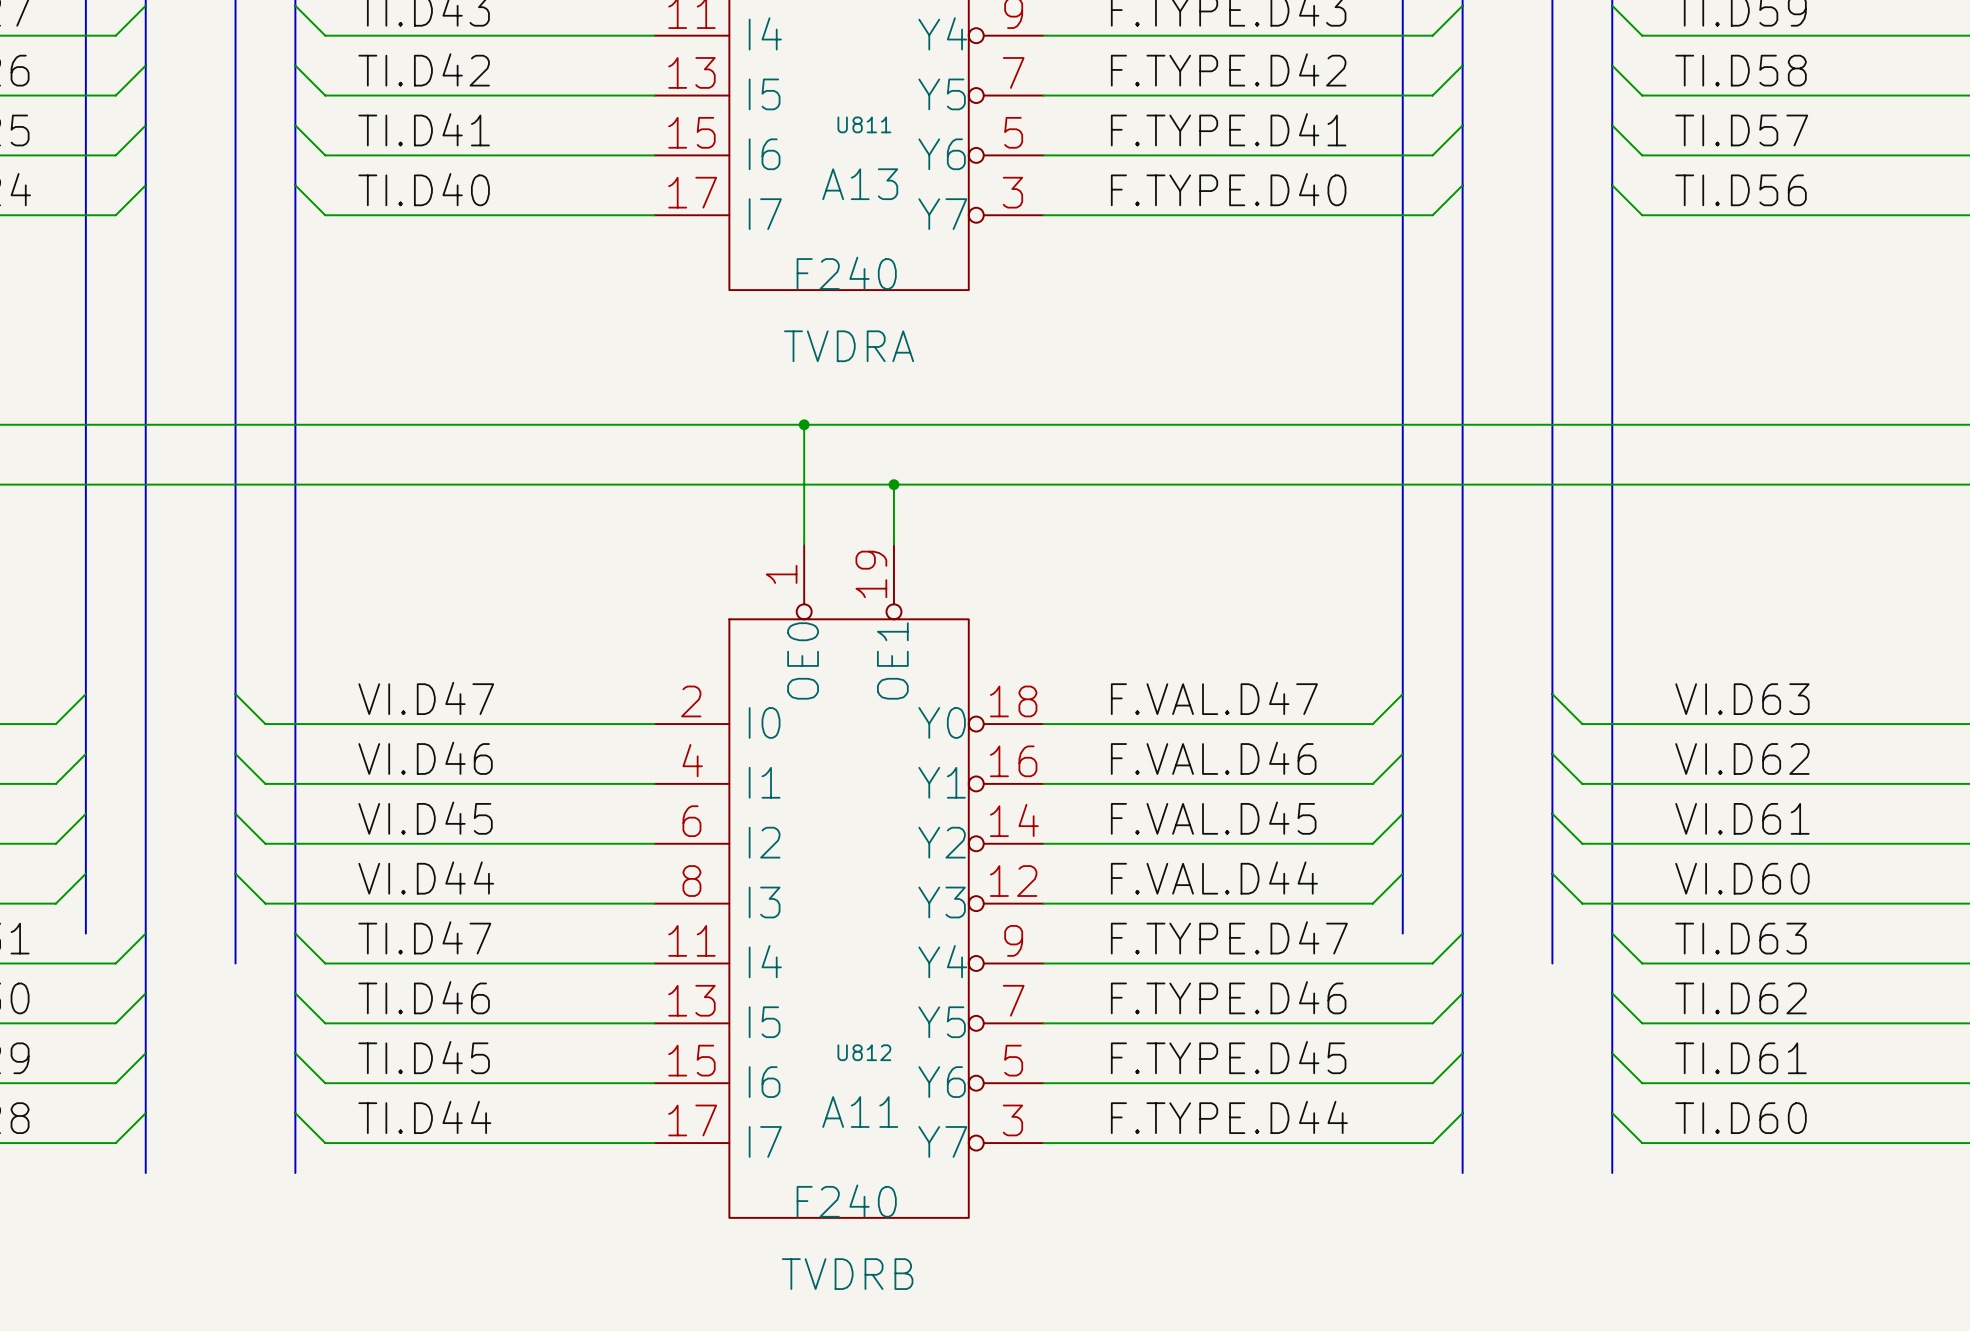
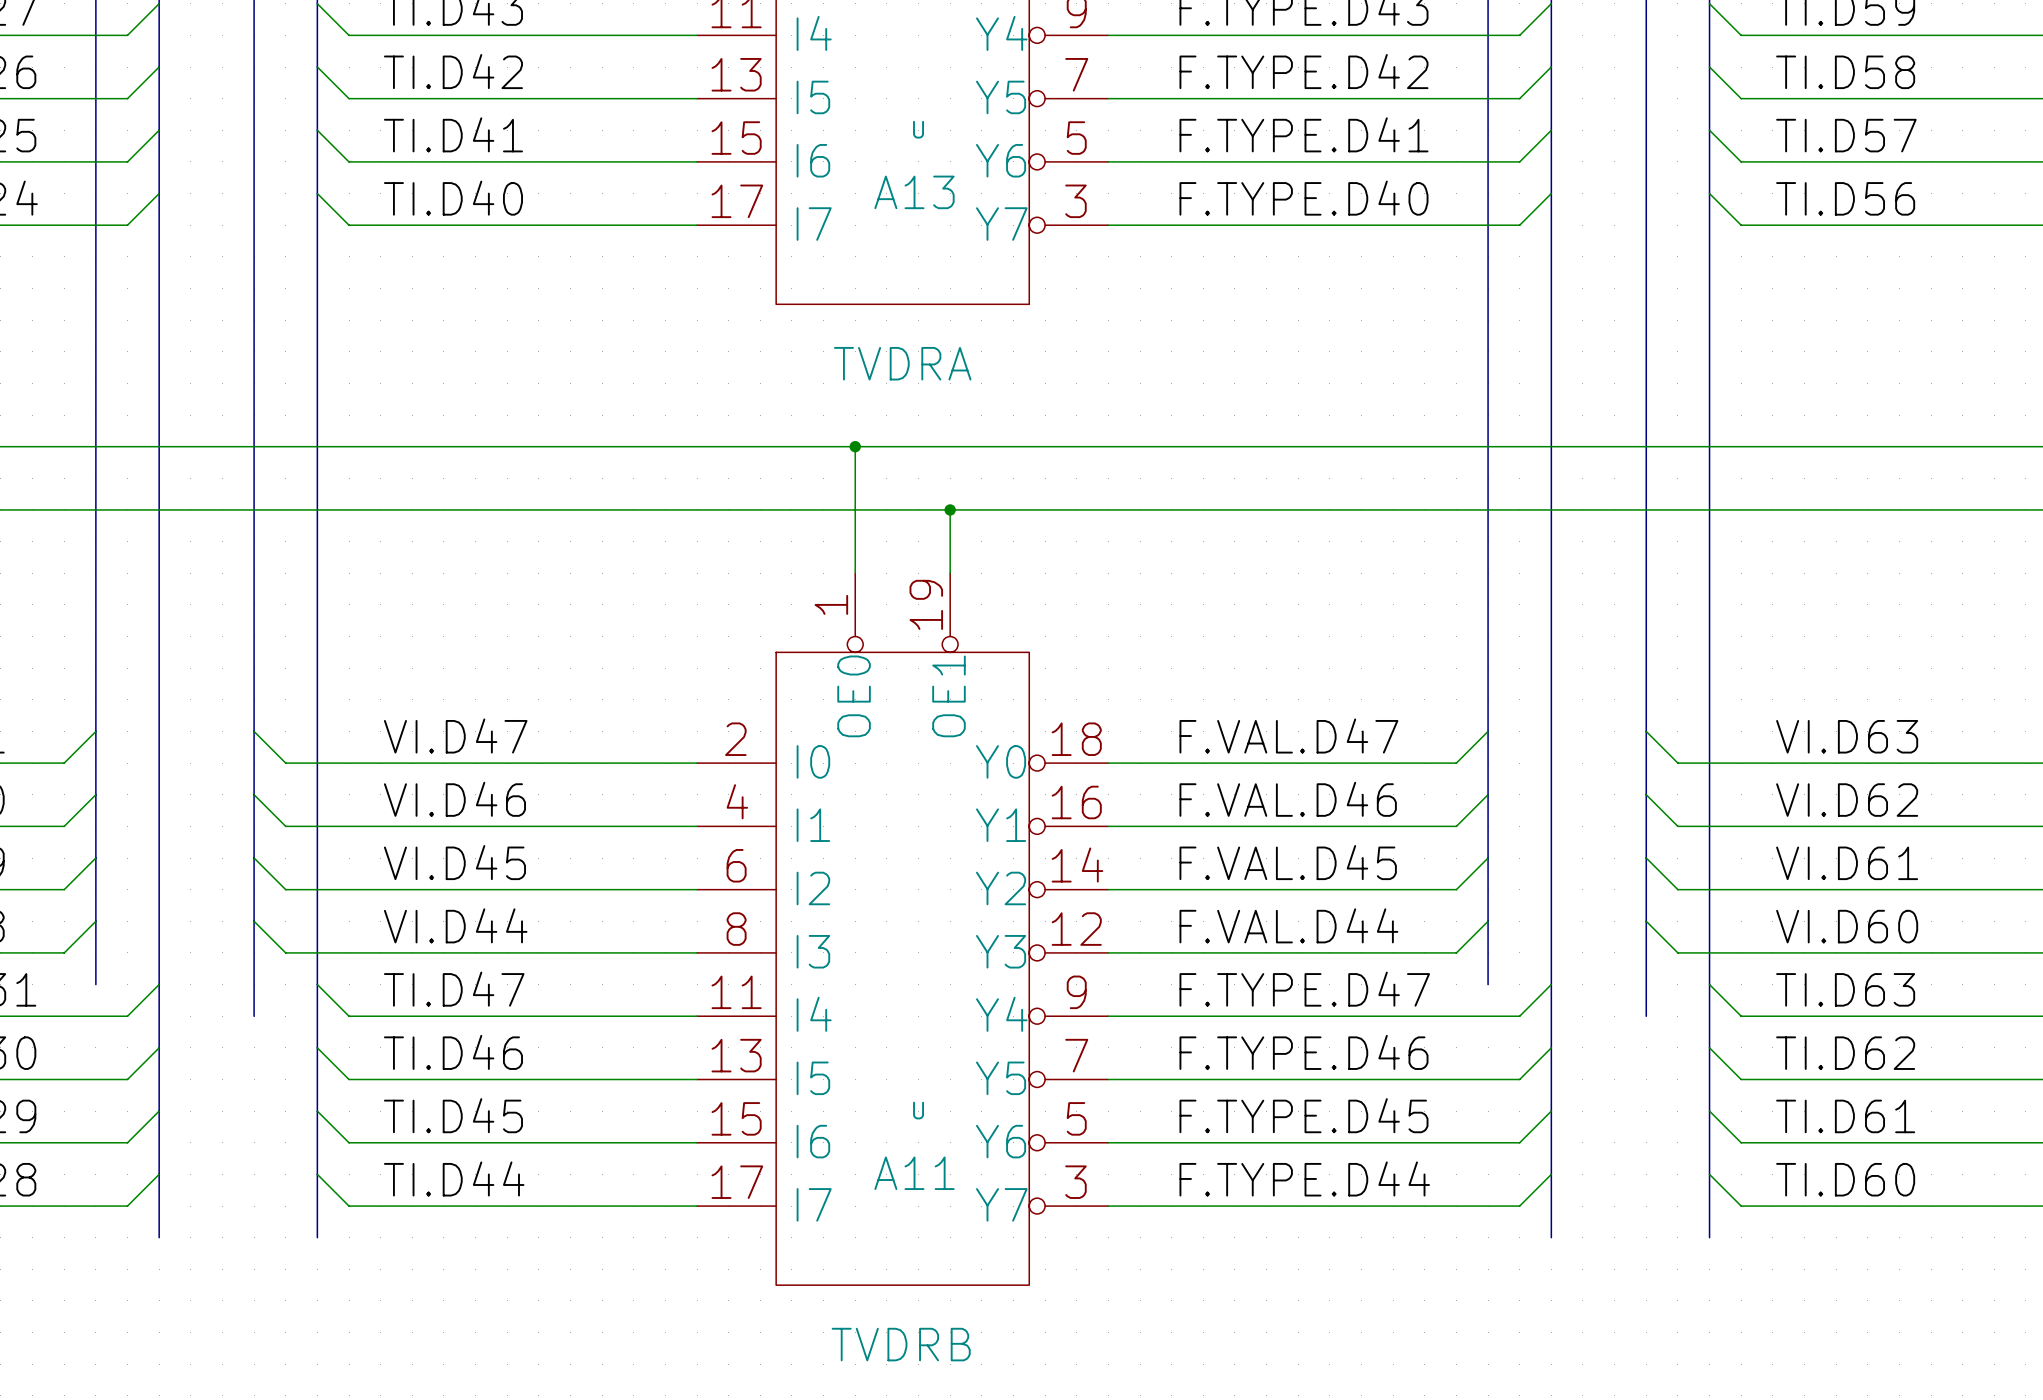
U811 name: U811 (864, 124) -> U (918, 129)
U811 value: F240 (846, 273) -> none
U812 name: U812 (864, 1052) -> U (918, 1110)
U812 value: F240 (846, 1201) -> none

